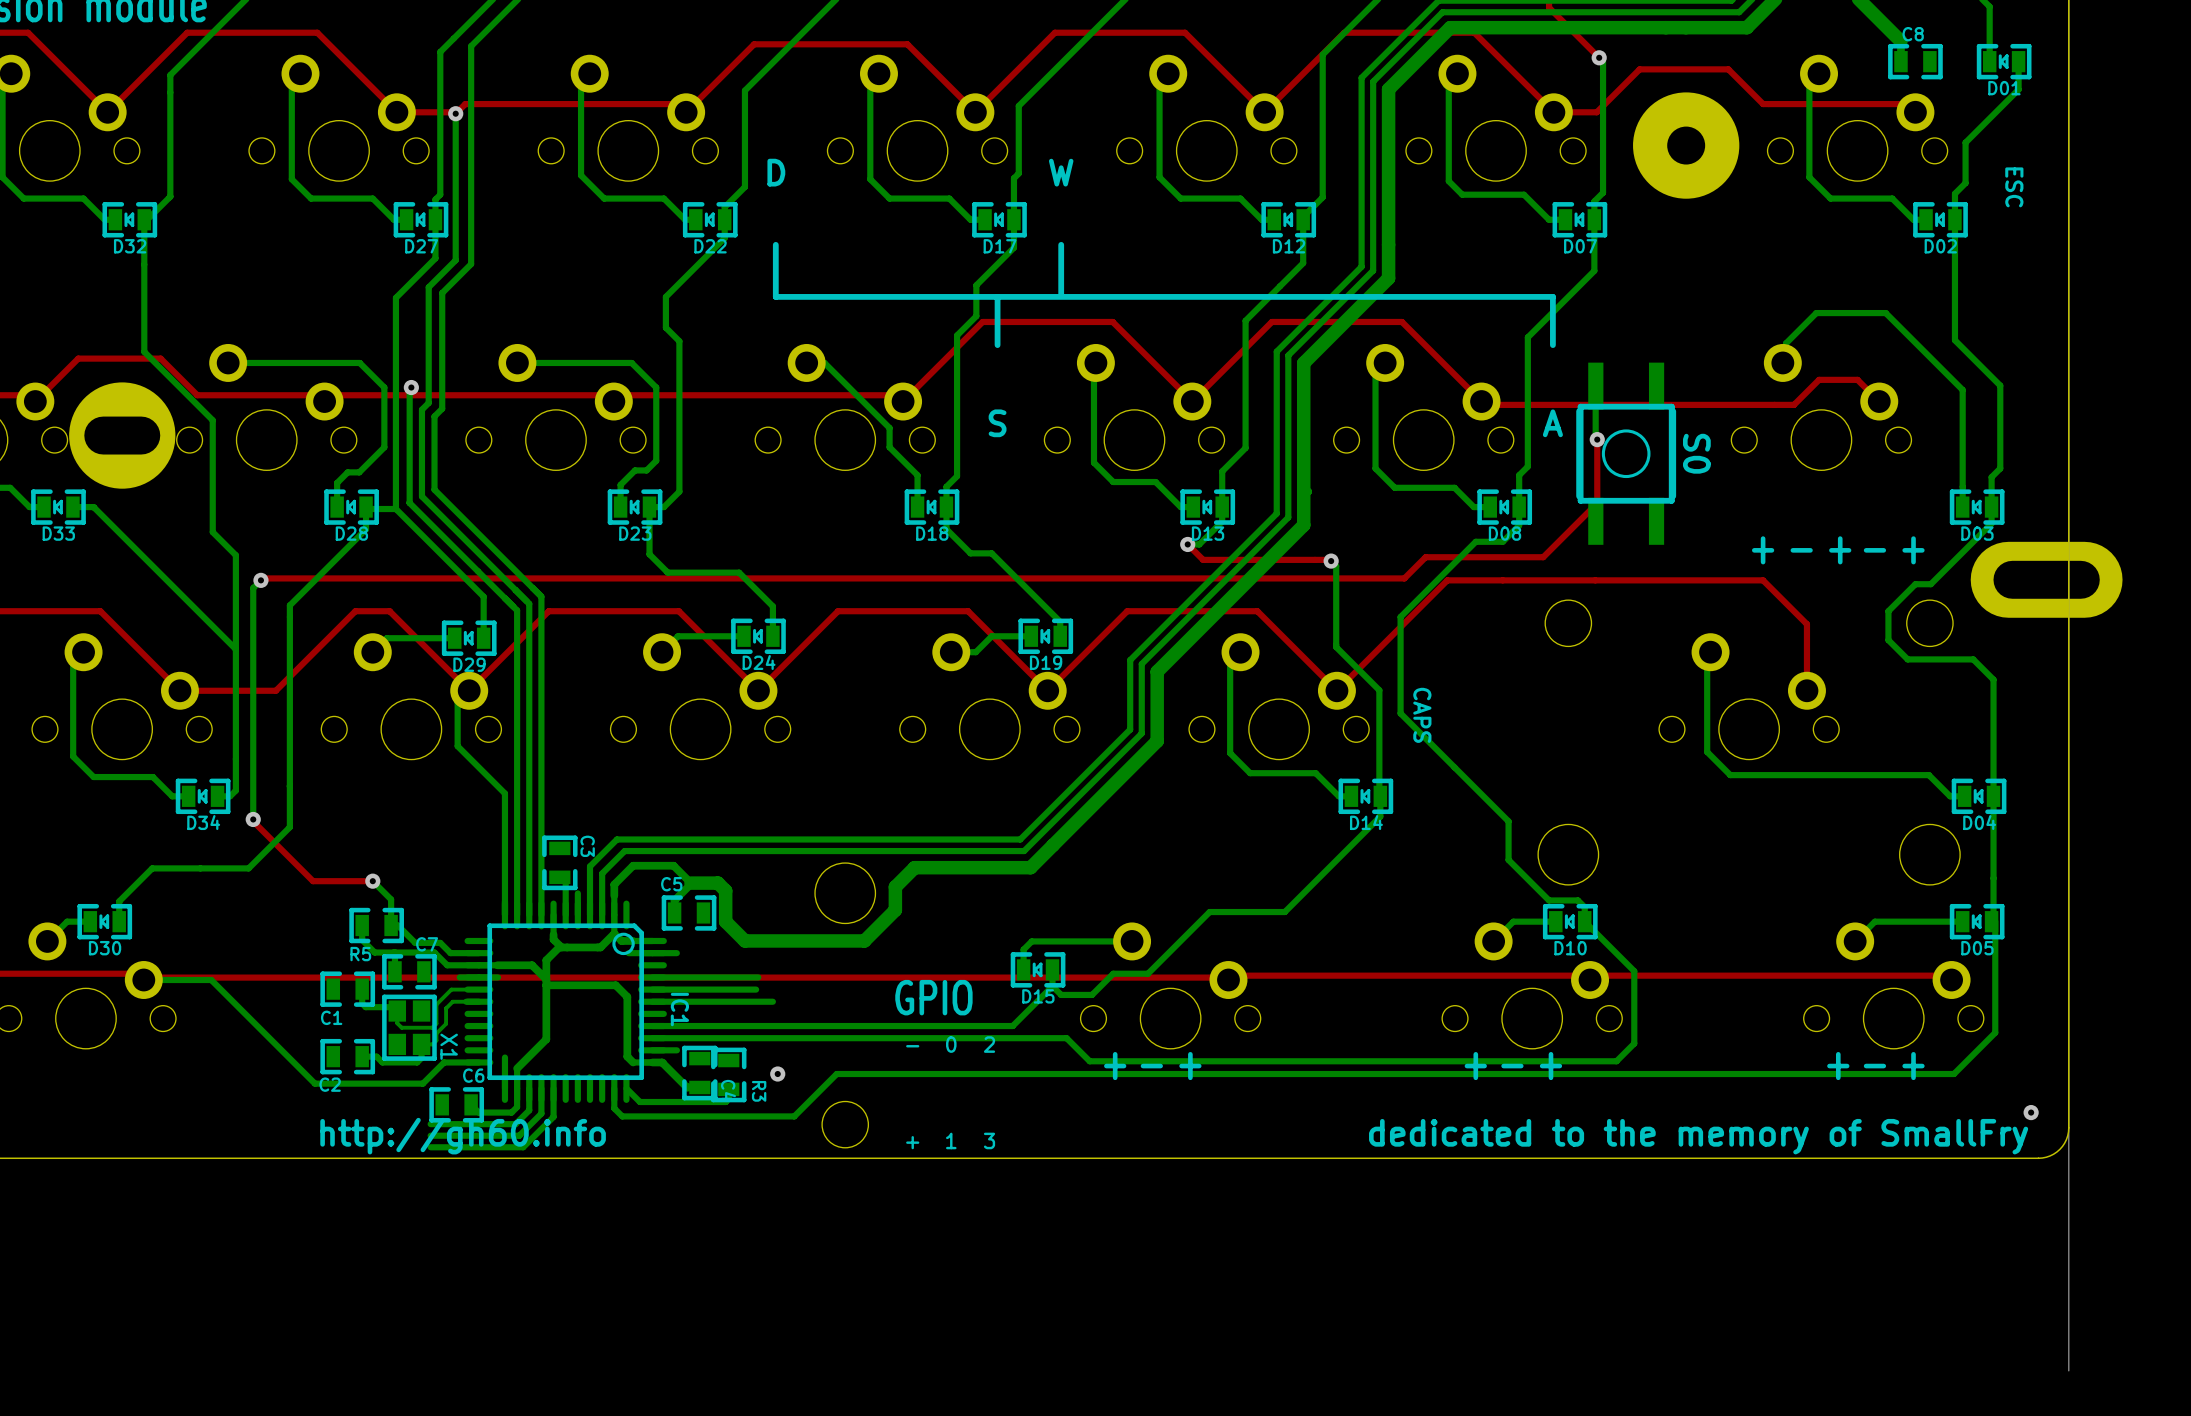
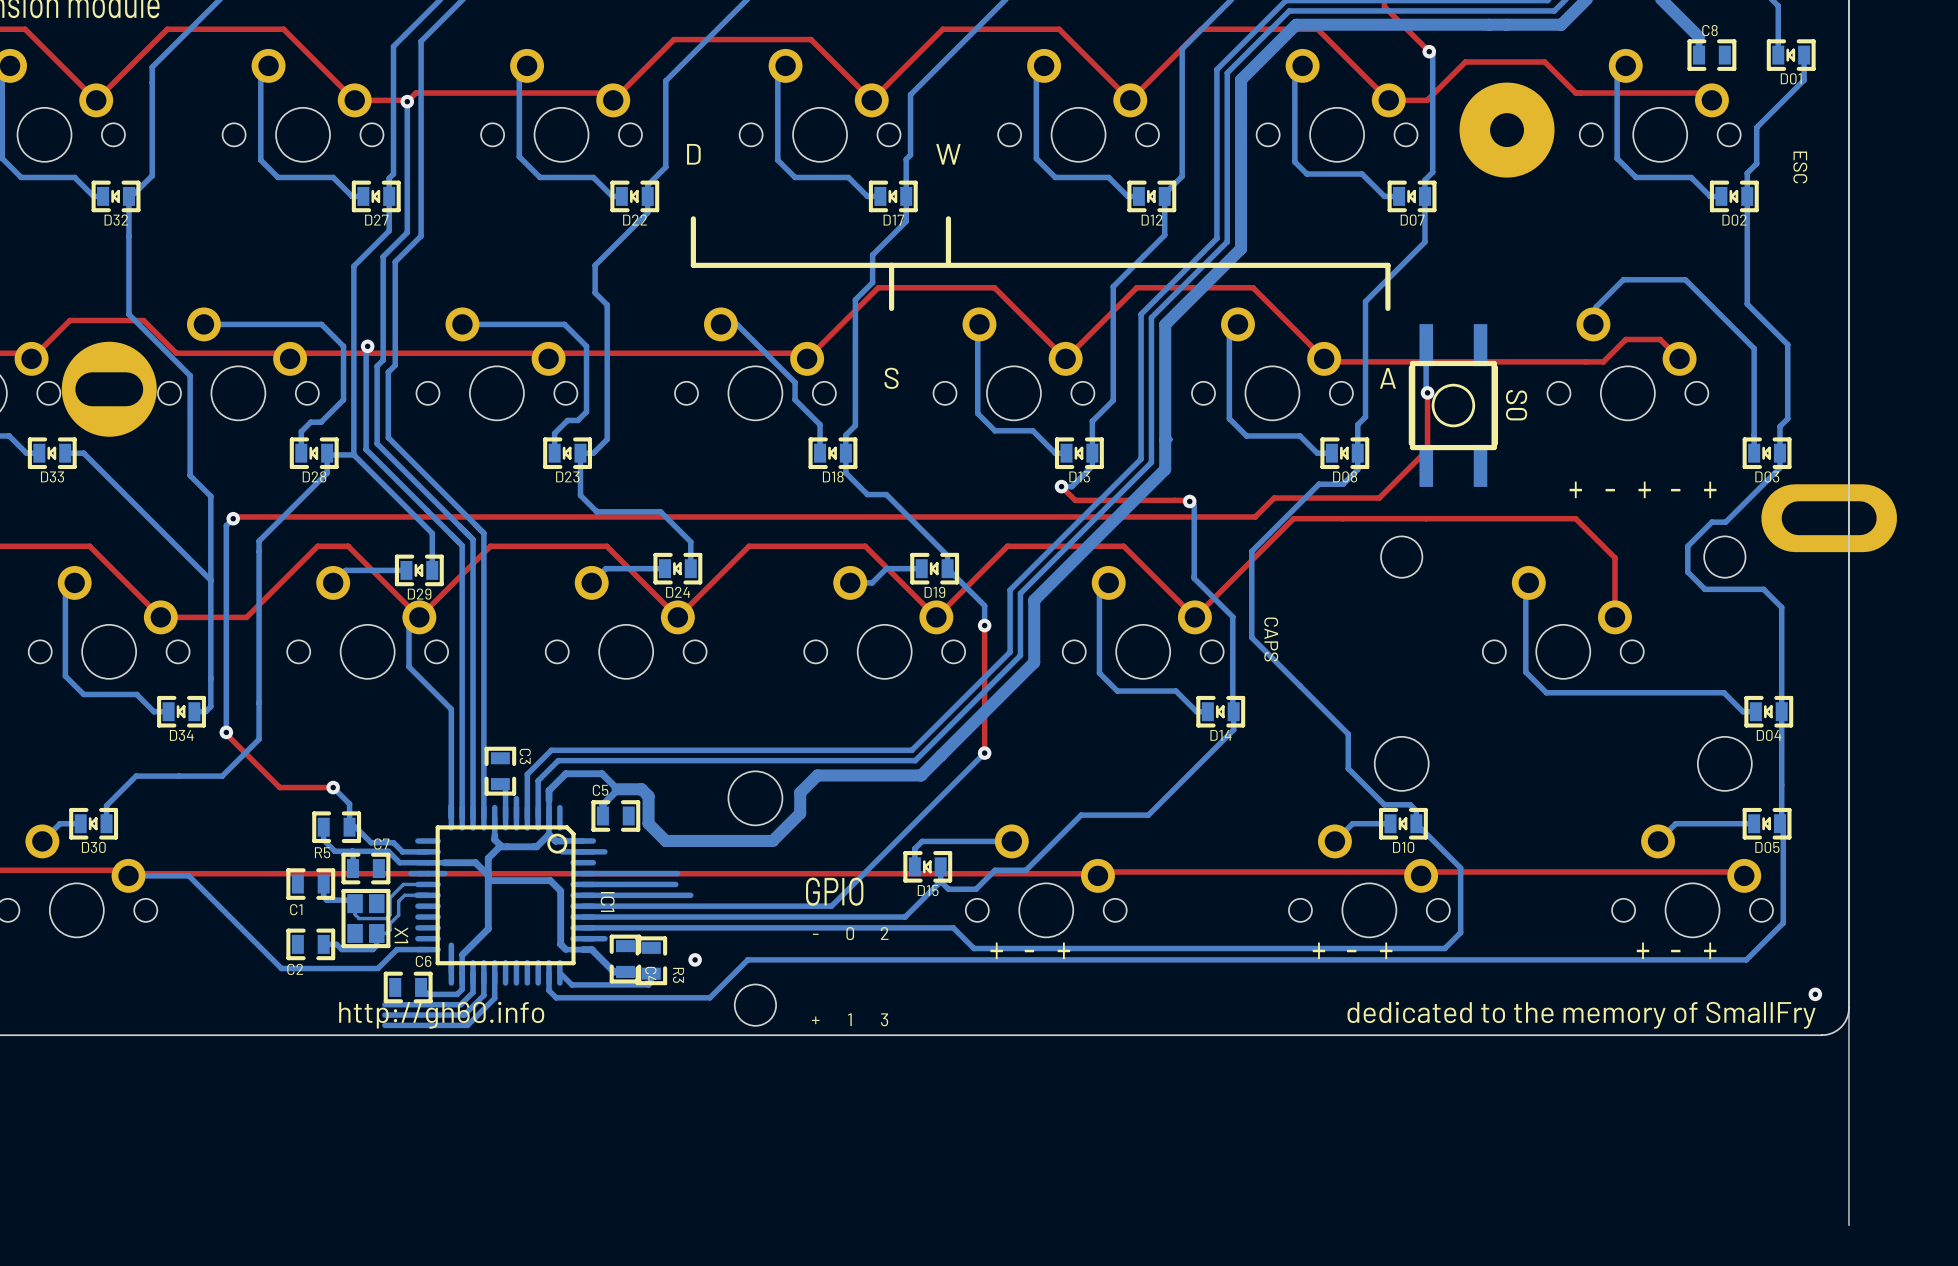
bottom track: none -> (947, 568) (984, 605) (984, 625)
top track: none -> (984, 625) (984, 753)
via: none -> (984, 625)
bottom track: none -> (984, 753) (831, 906) (583, 906)
via: none -> (984, 753)

